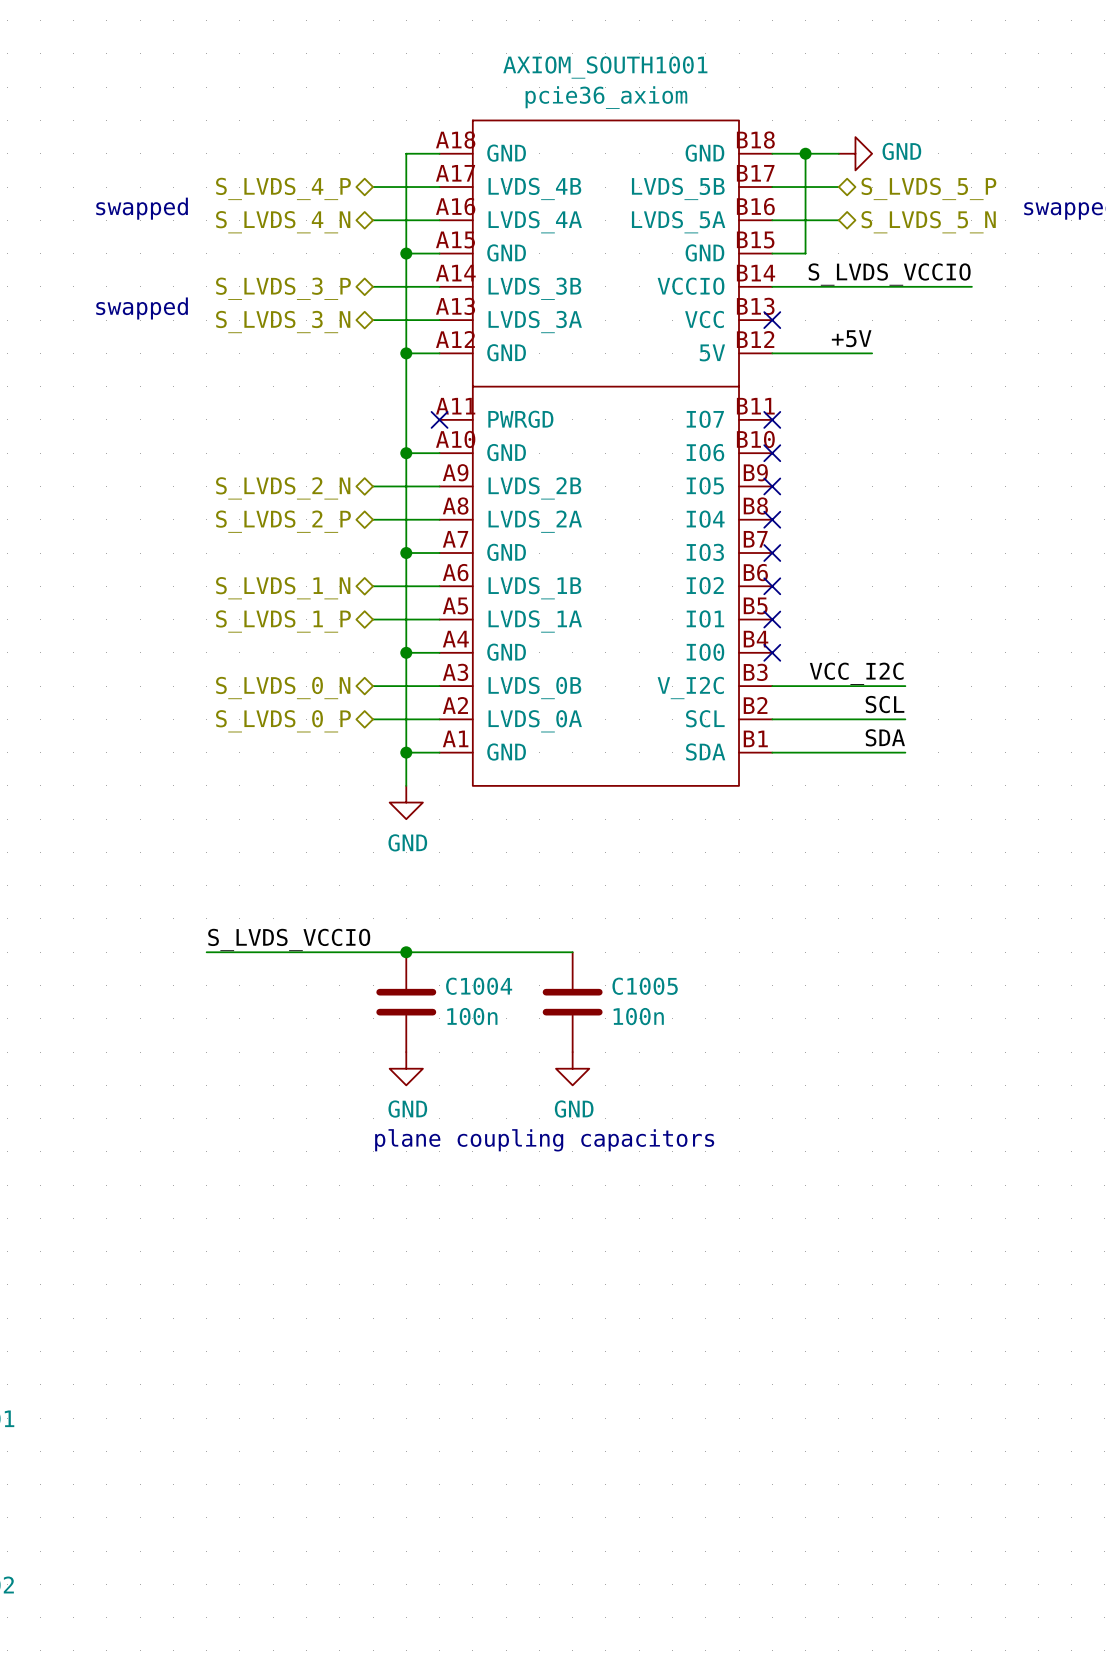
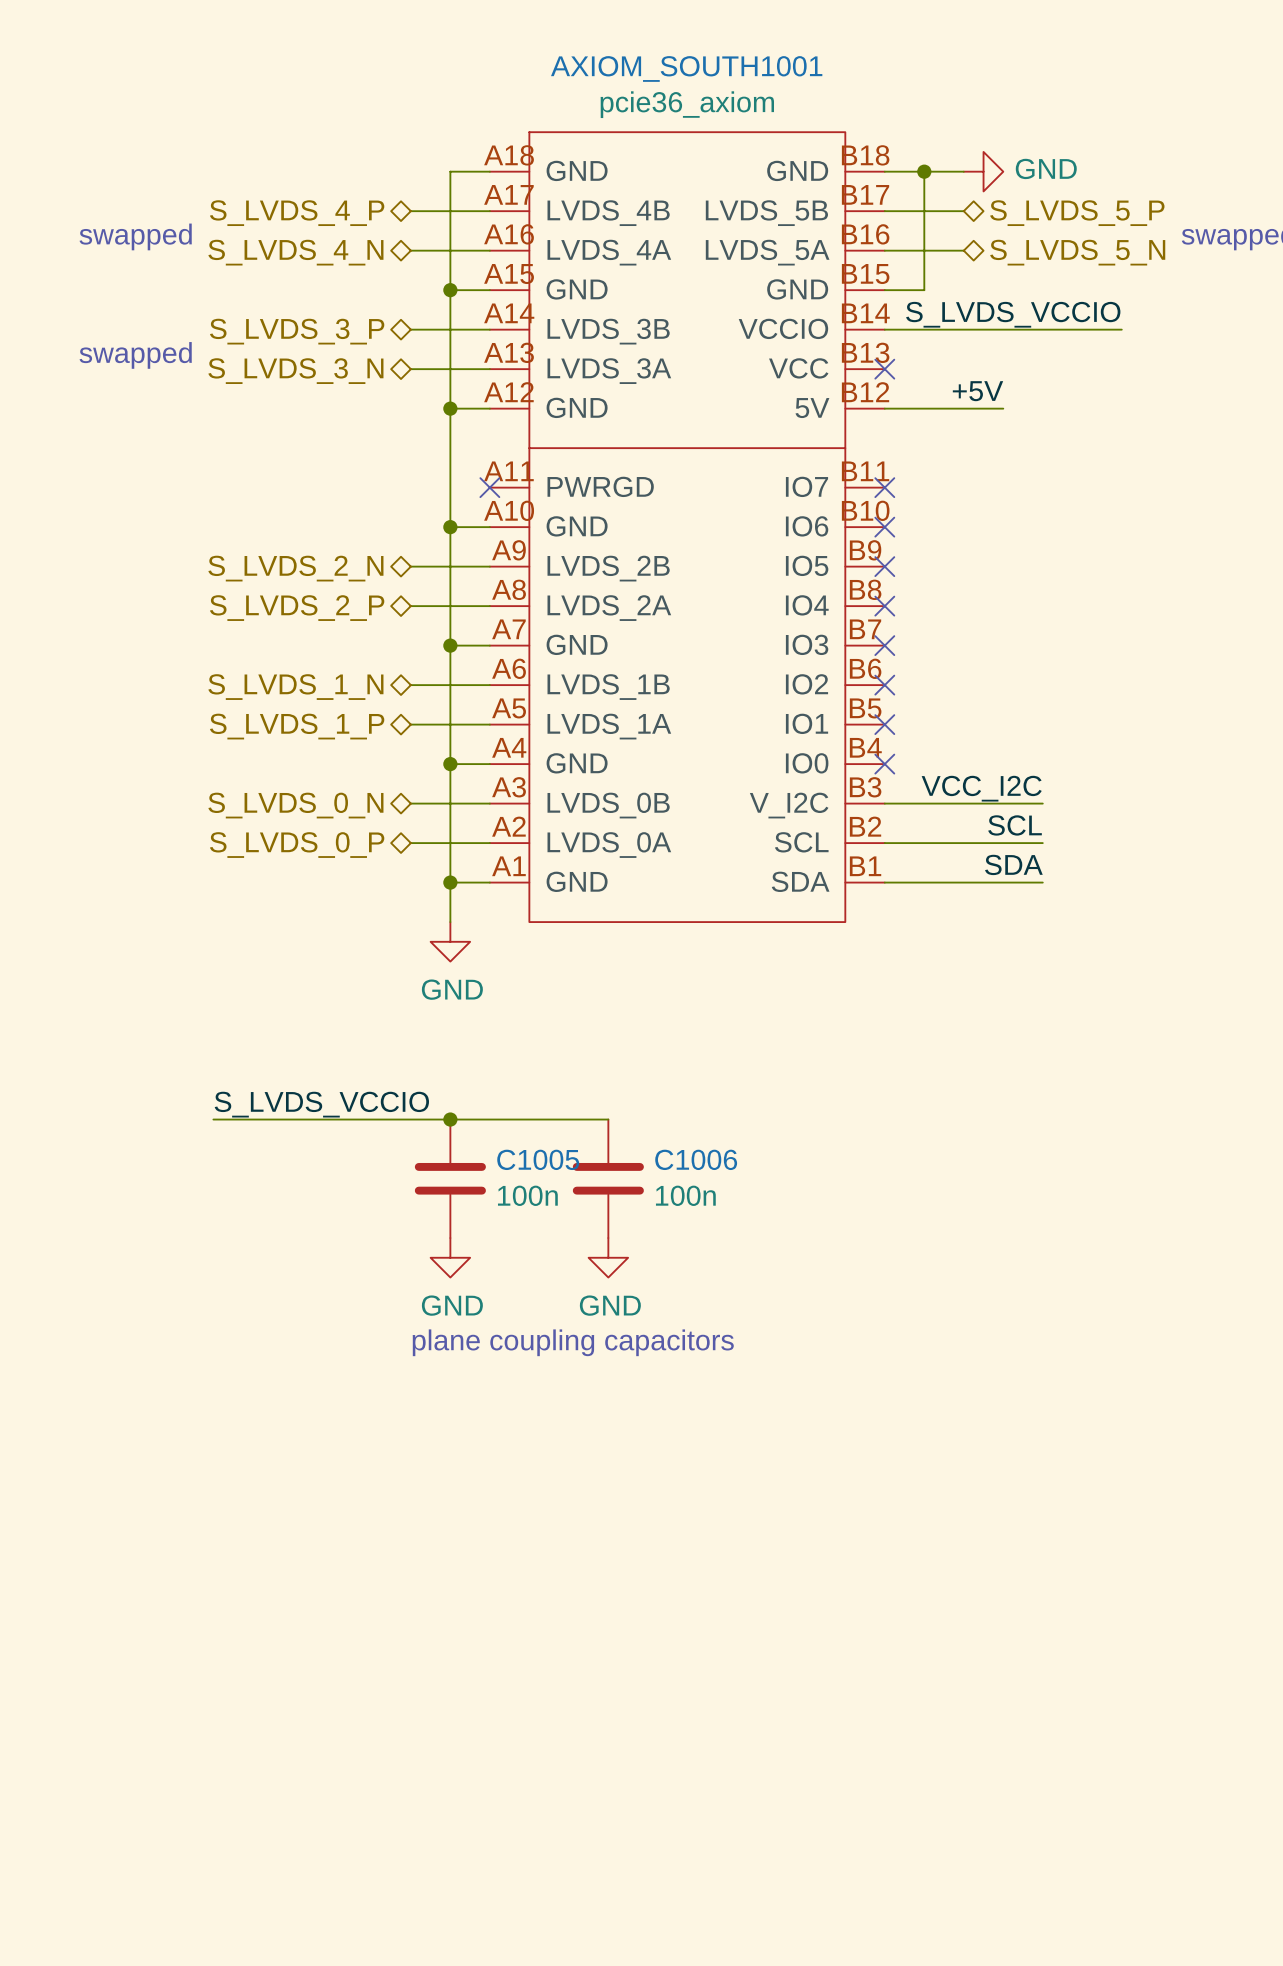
wire: (539, 952) (572, 952) -> none
C1004 name: C1004 (479, 986) -> C1005 (538, 1159)
C1006: none -> 100n (608, 1178)
C1005: 100n (572, 1002) -> none
power symbol position: GND (572, 1068) -> GND (608, 1257)

